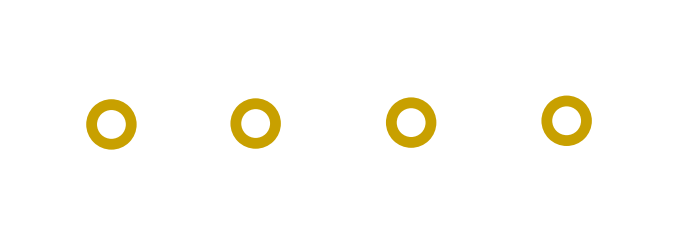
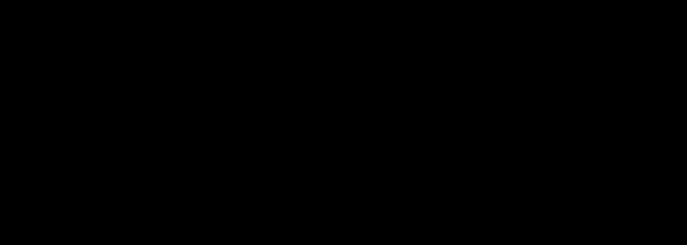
part: (566, 120) -> none
part: (411, 122) -> none
part: (255, 123) -> none
part: (111, 124) -> none

